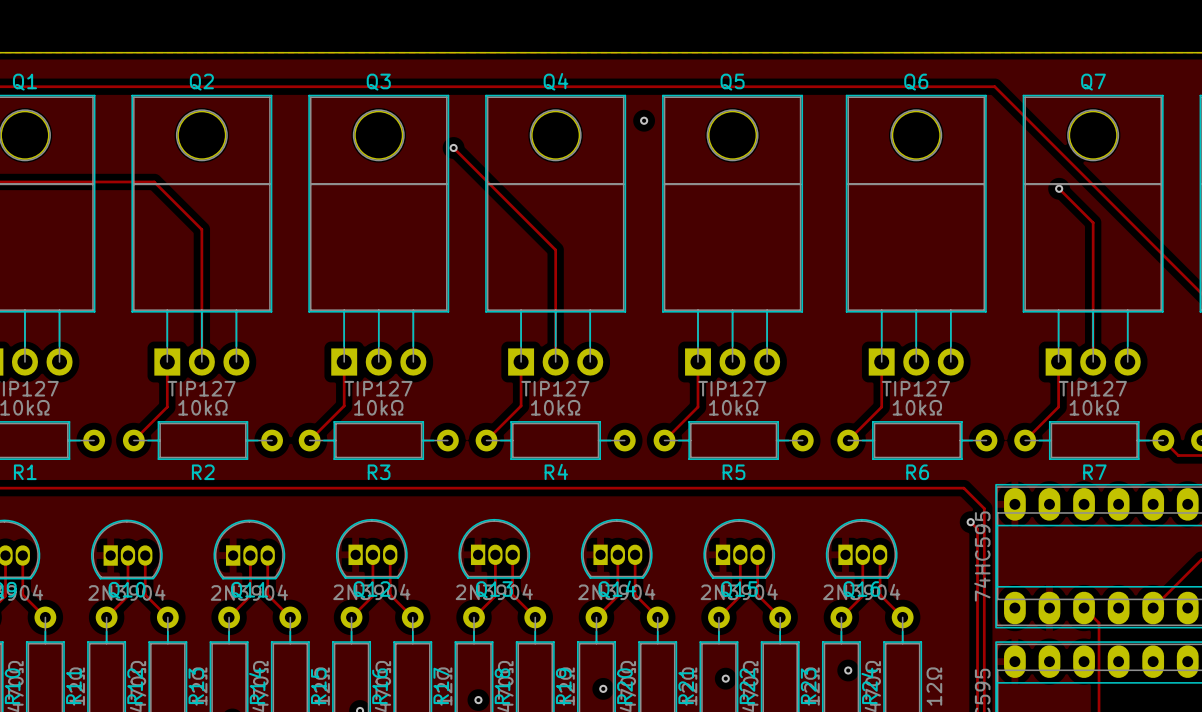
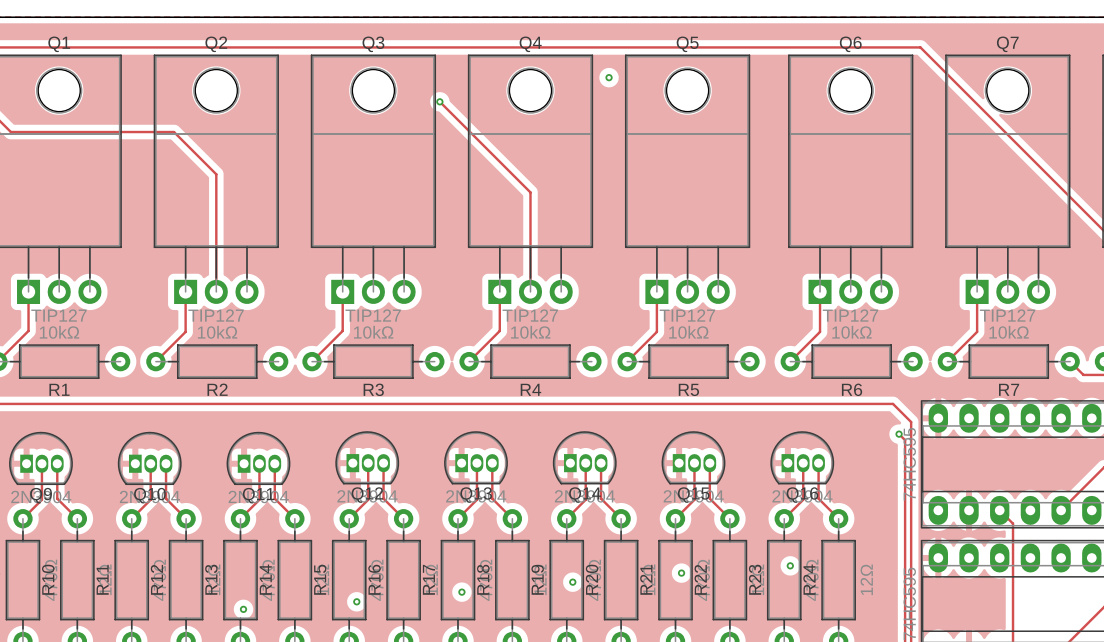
track: (1059, 188) (1093, 222) (1093, 362) -> none
via: (1059, 188) -> none

